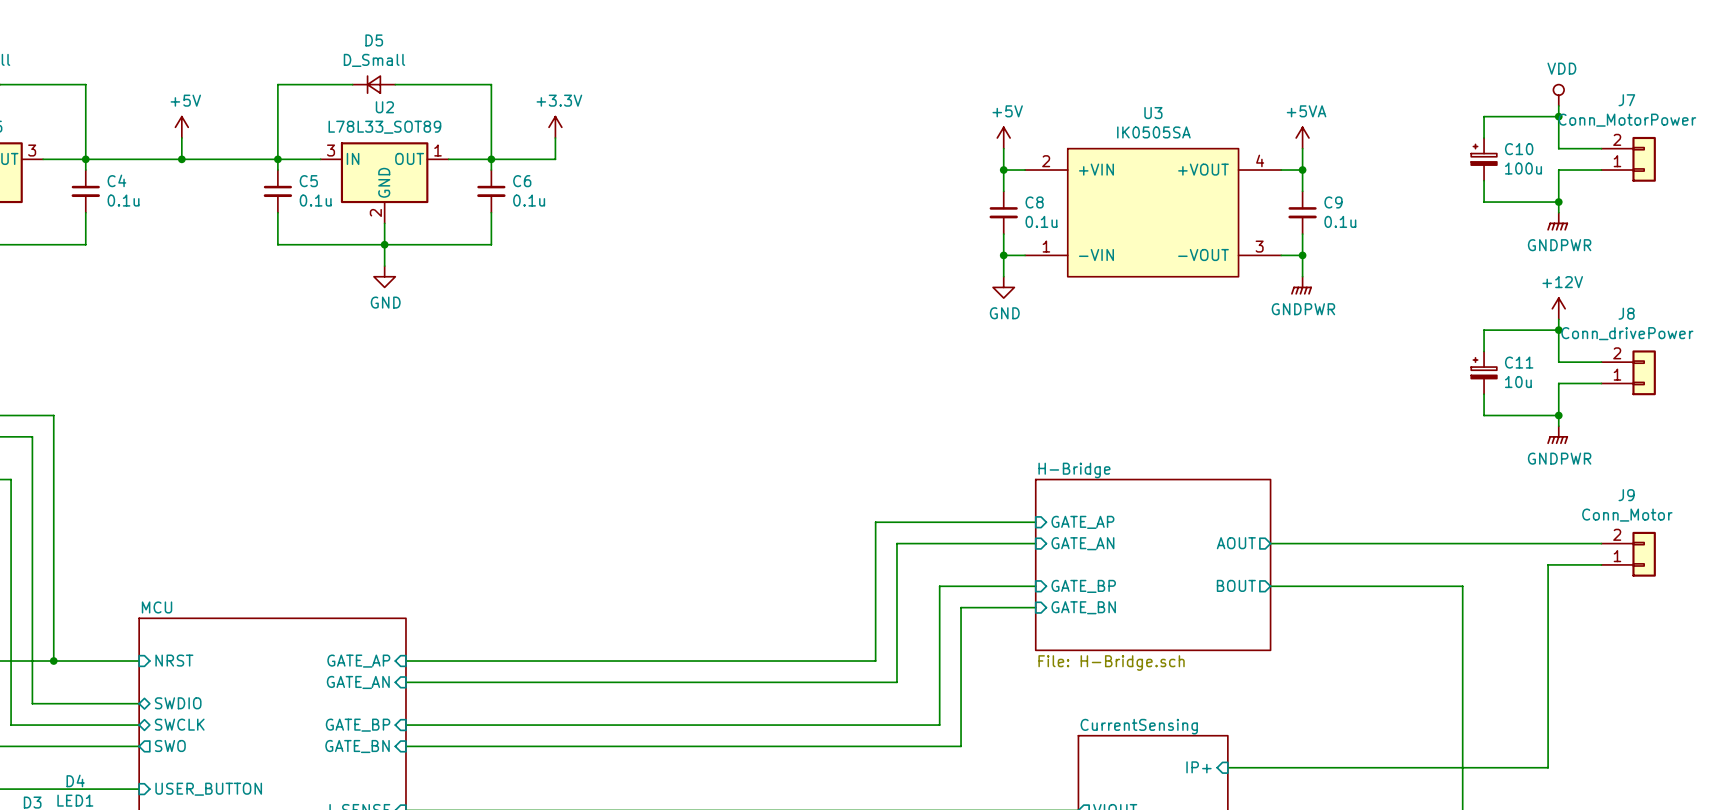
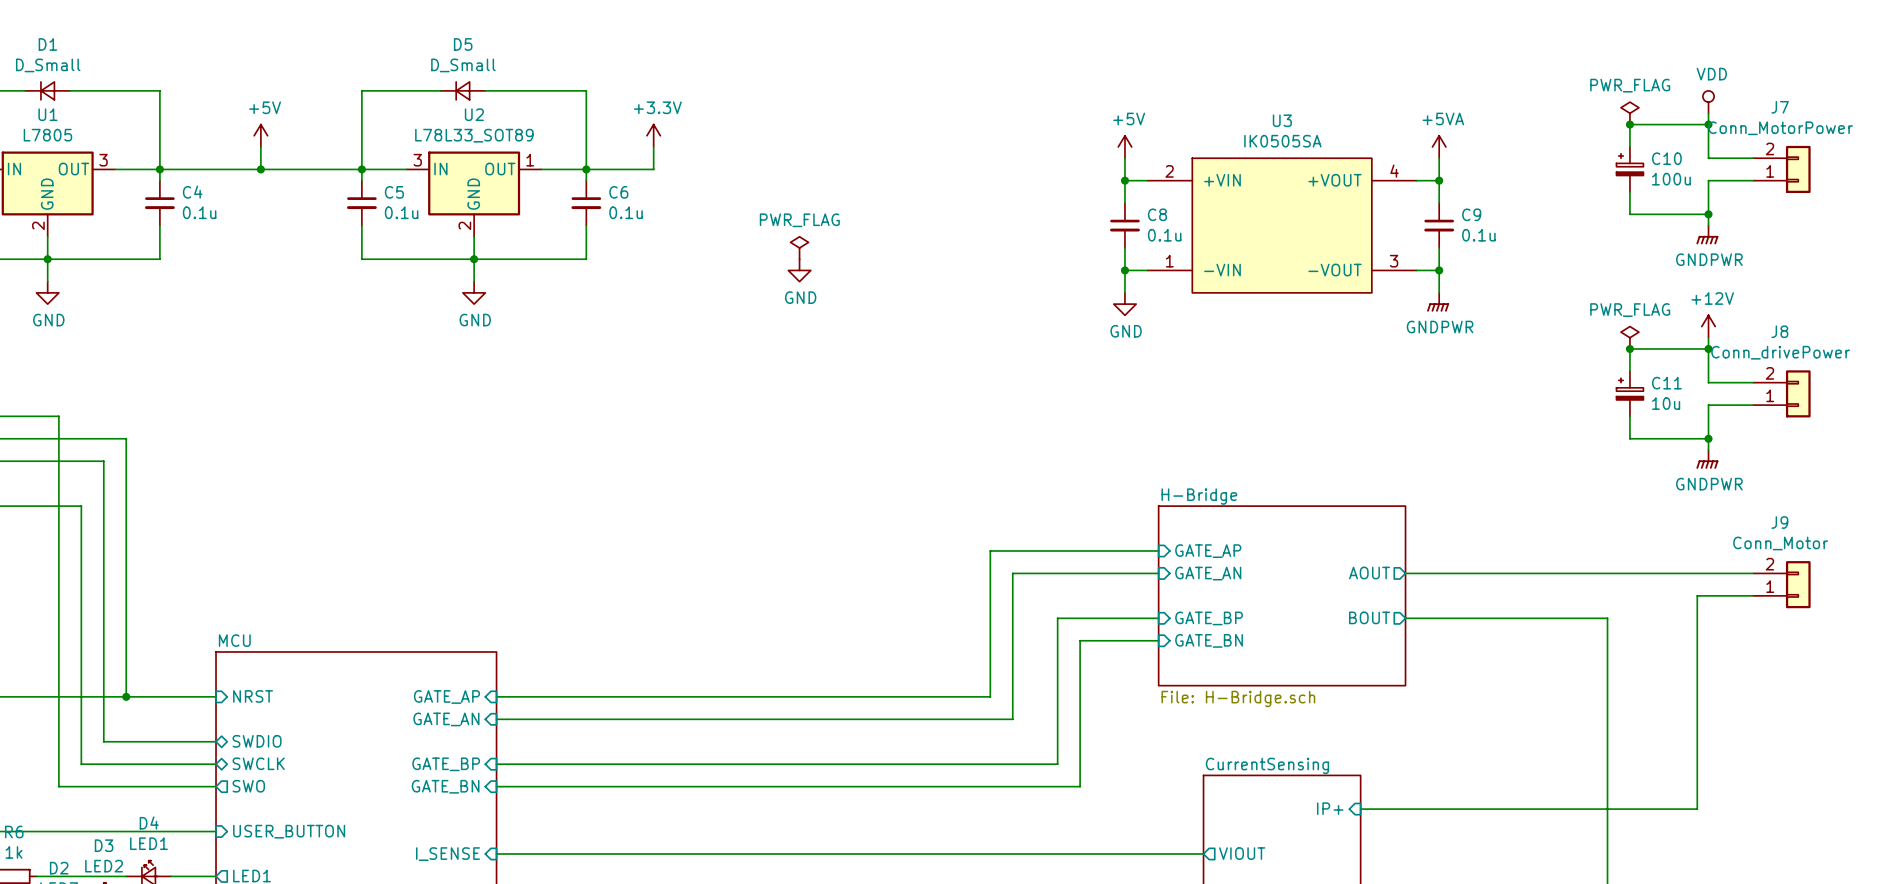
power symbol: none -> PWR_FLAG (1629, 113)
junction: none -> (1629, 124)
power symbol: none -> PWR_FLAG (799, 248)
power symbol: none -> GND (799, 270)
power symbol: none -> PWR_FLAG (1629, 337)
junction: none -> (1629, 348)

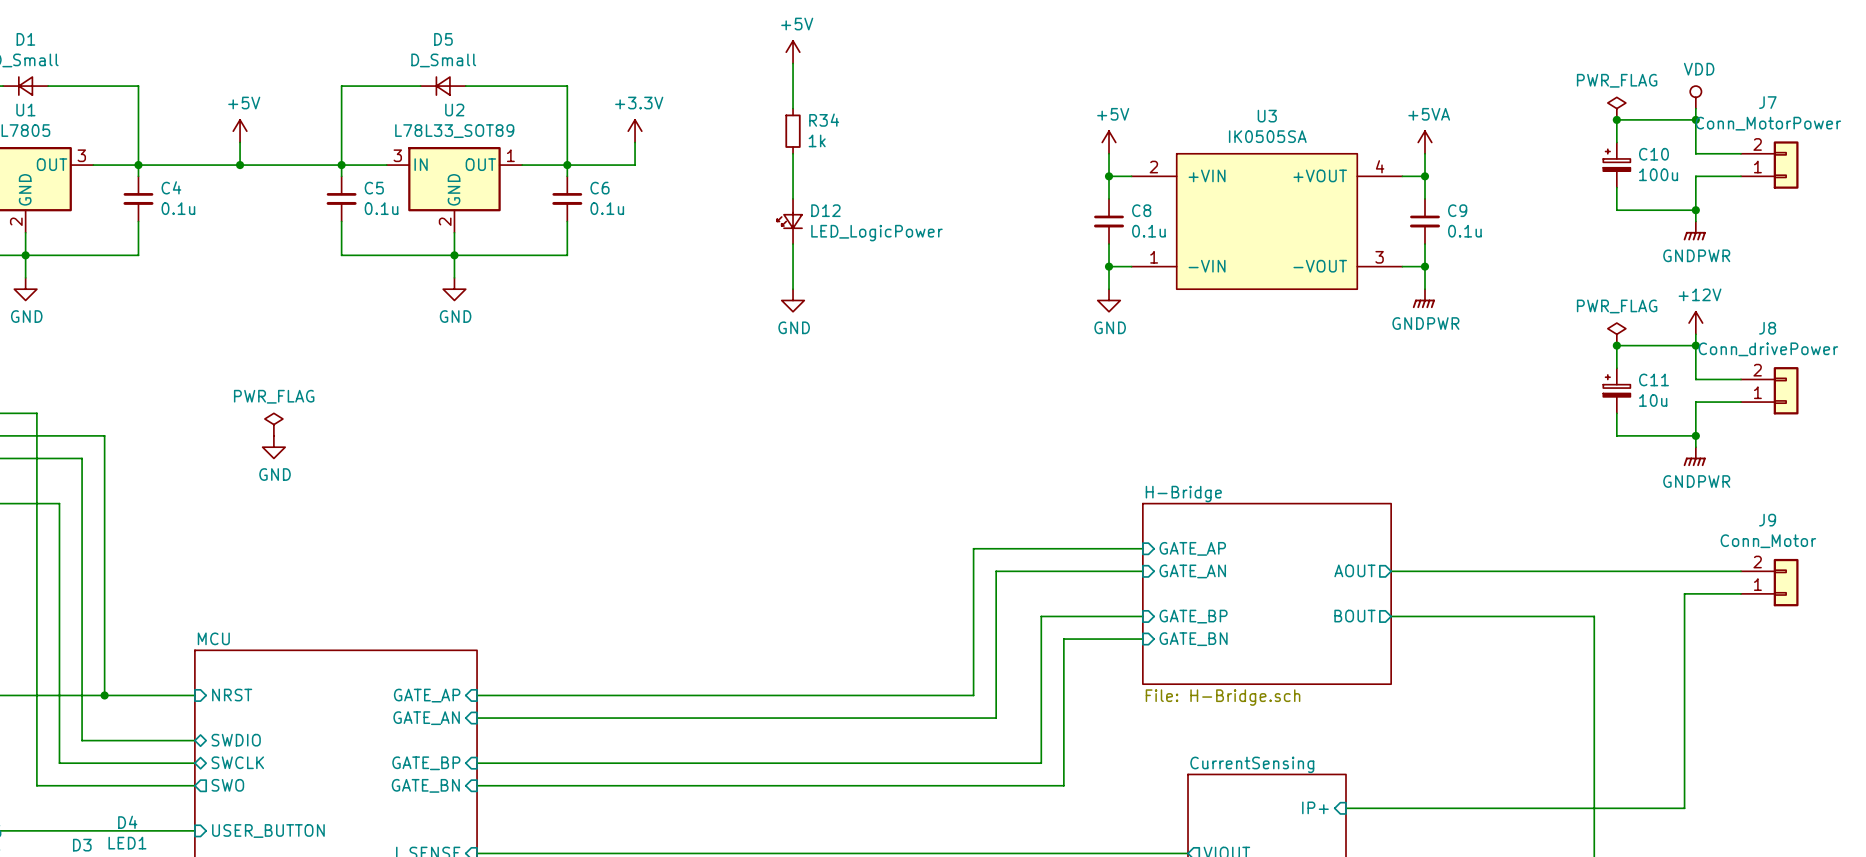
power symbol: none -> +5V (793, 52)
wire: none -> (793, 63) (793, 108)
R34: none -> 1k (793, 131)
wire: none -> (793, 153) (793, 198)
D12: none -> LED_LogicPower (789, 221)
power symbol: PWR_FLAG (799, 248) -> none
wire: none -> (793, 244) (793, 289)
power symbol position: GND (799, 270) -> GND (793, 300)
power symbol: none -> PWR_FLAG (273, 424)
power symbol: none -> GND (273, 447)

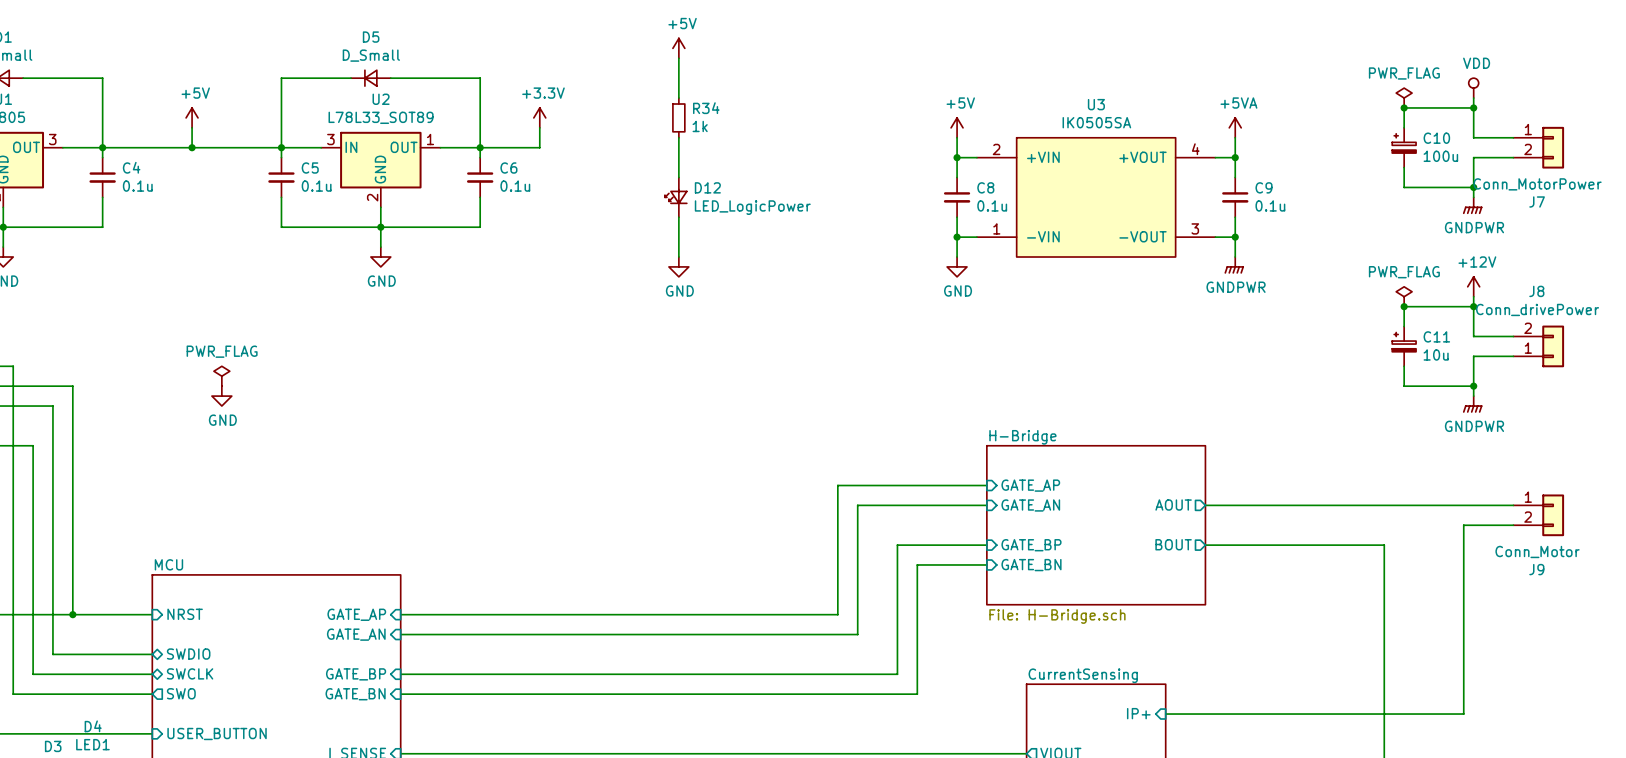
J7 flip: as is (1786, 165) -> up-down (1553, 147)
J9 flip: as is (1786, 582) -> up-down (1553, 515)

